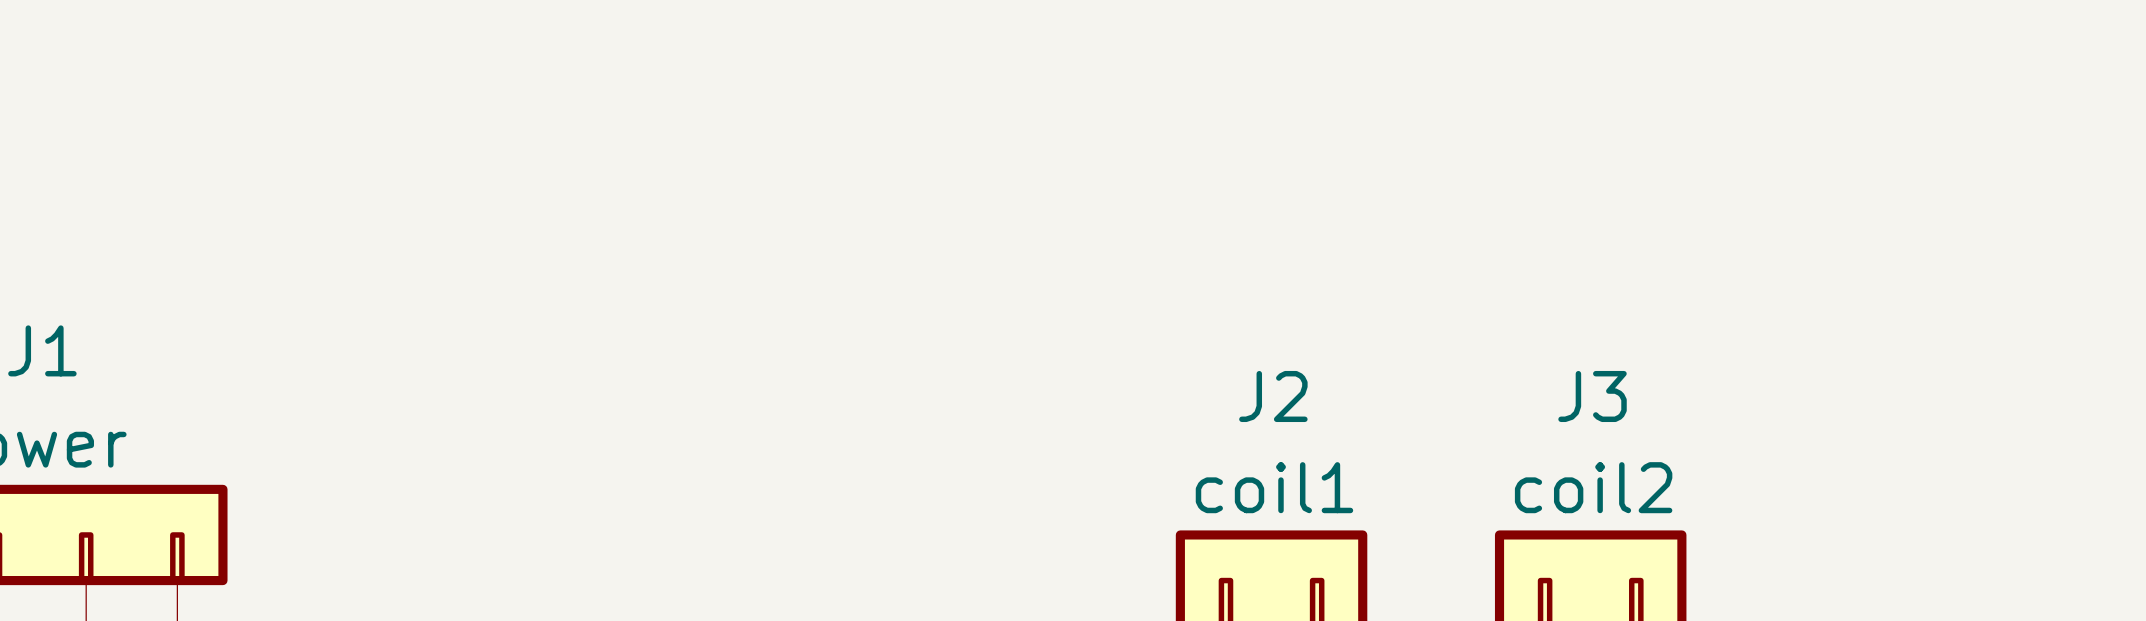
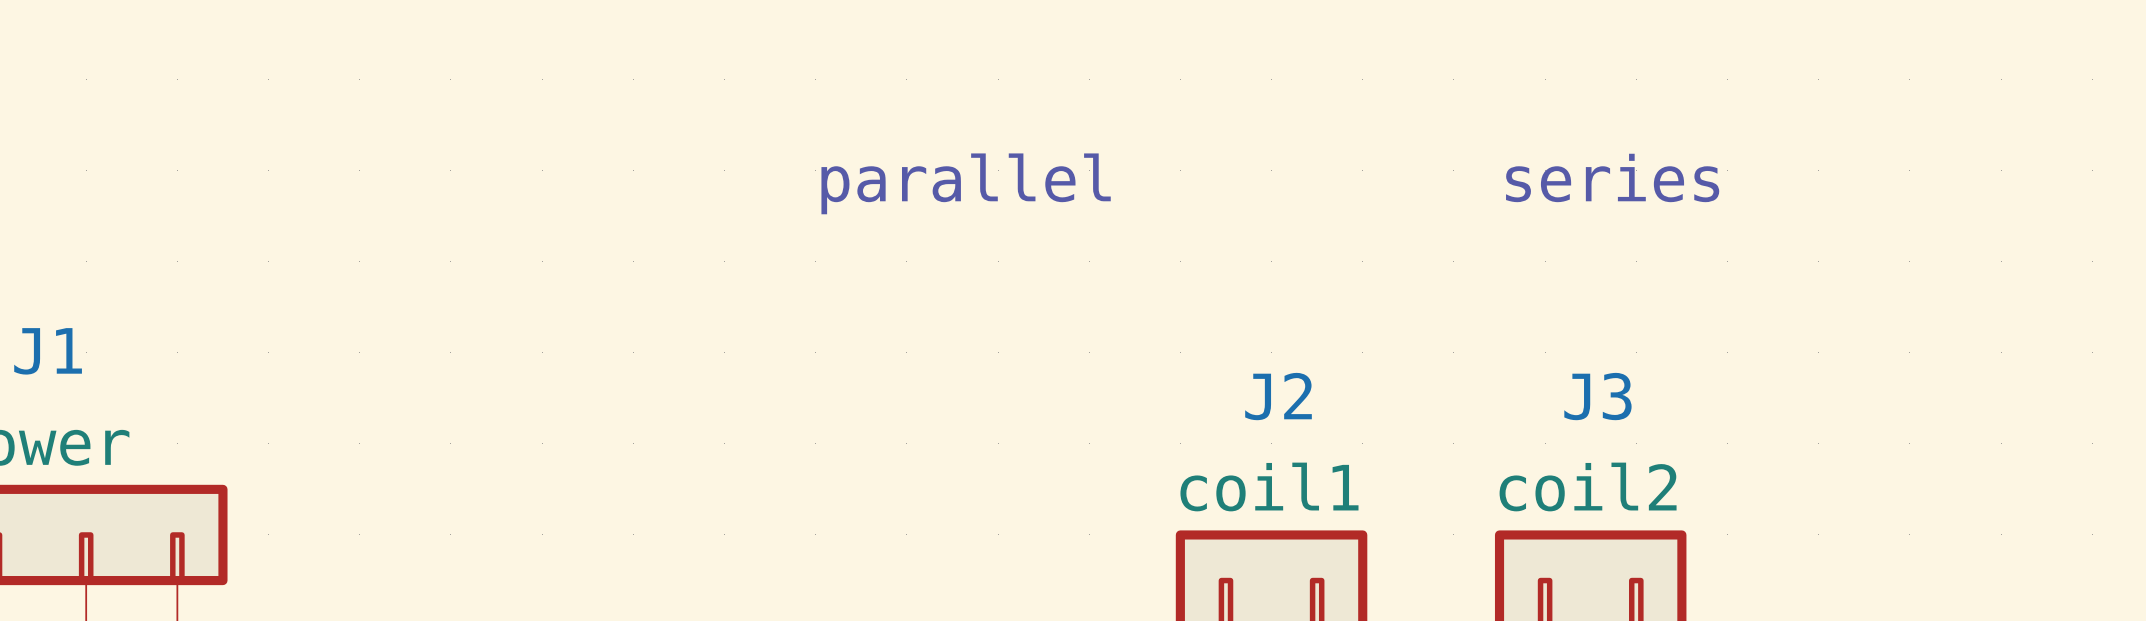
text: none -> series (1612, 177)
text: none -> parallel (966, 183)

